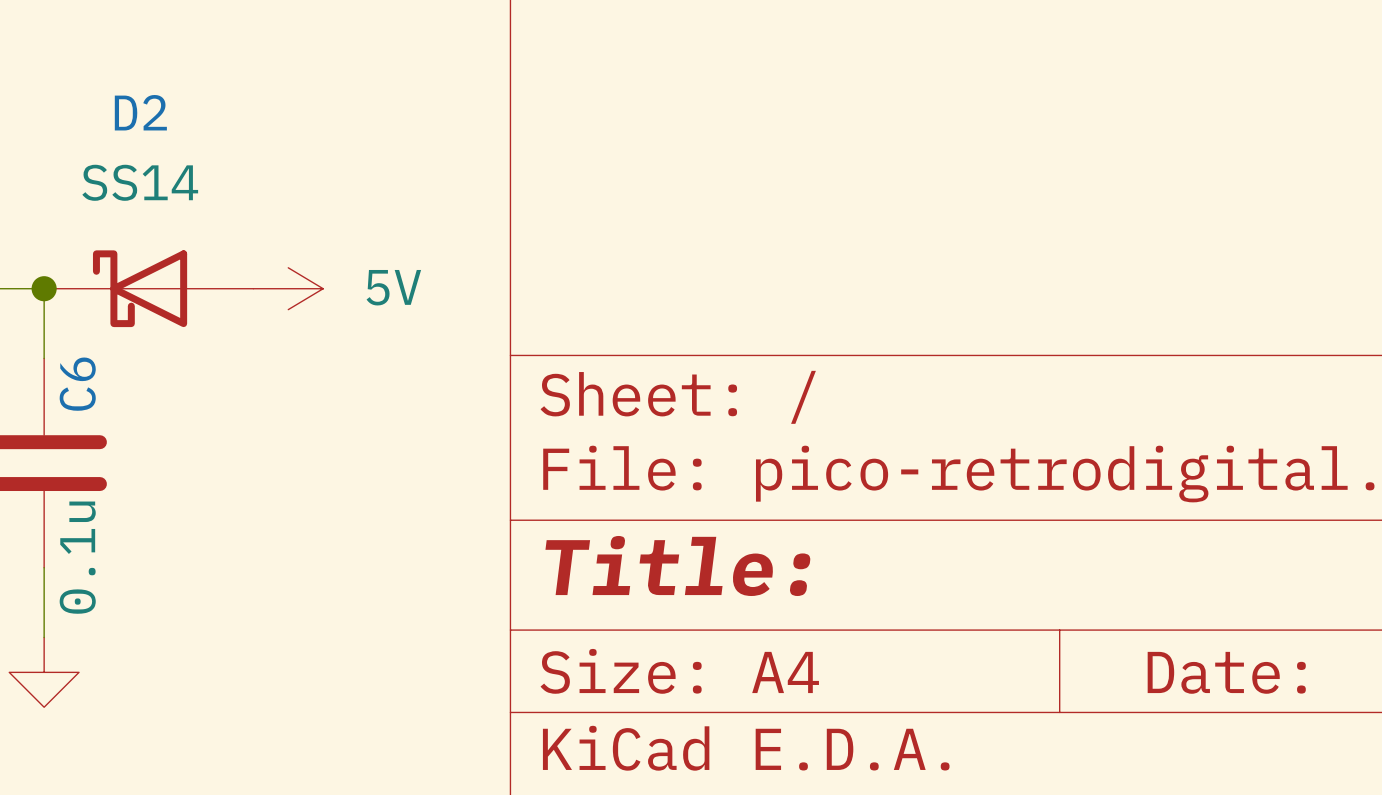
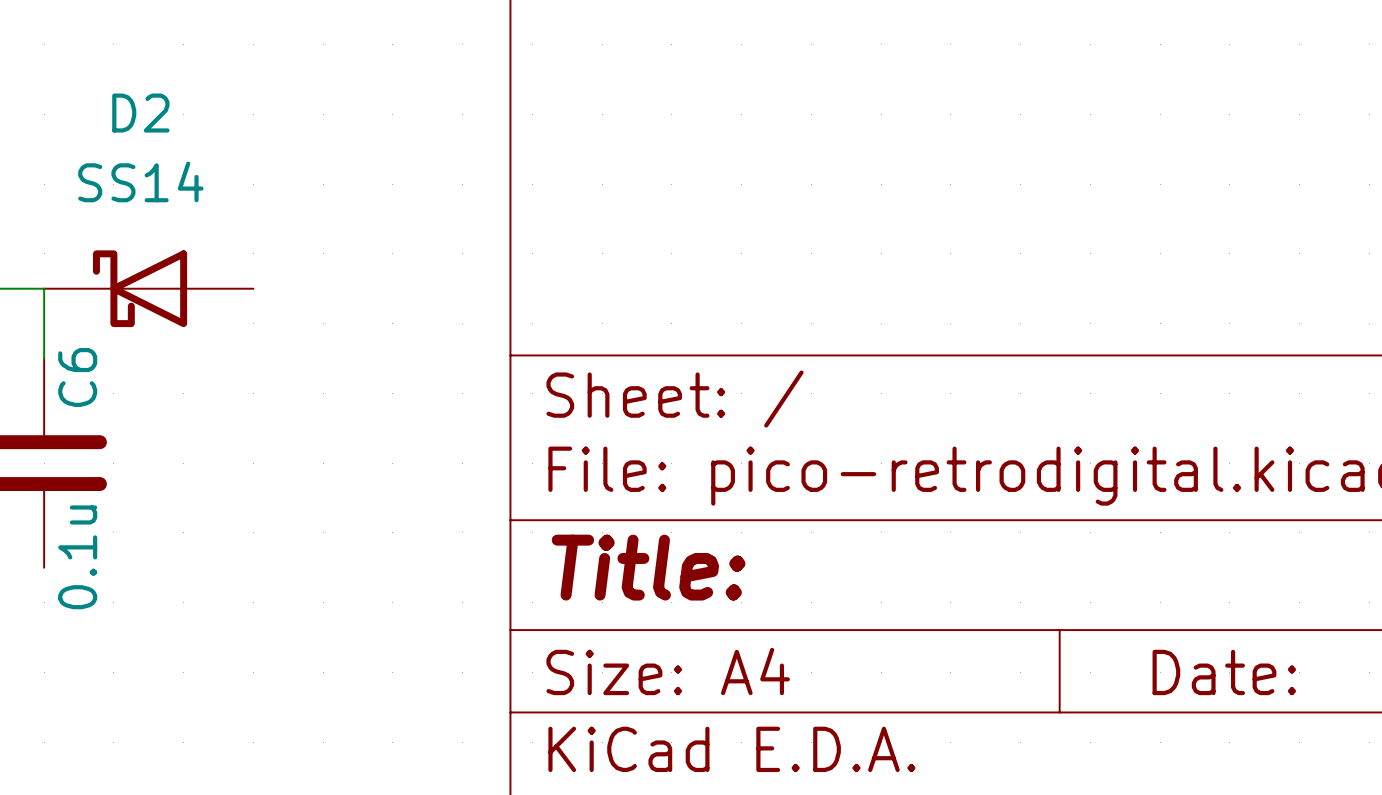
junction: (44, 288) -> none
power symbol: 5V (288, 288) -> none
wire: (44, 567) (44, 637) -> none
power symbol: (44, 672) -> none

